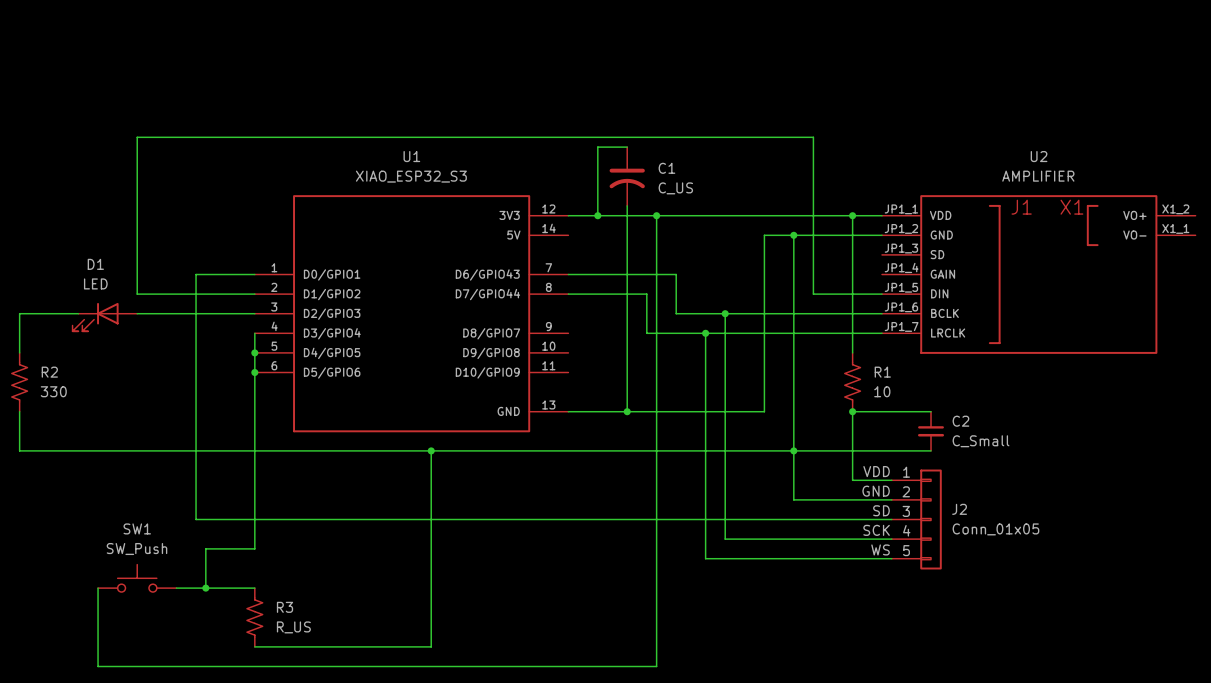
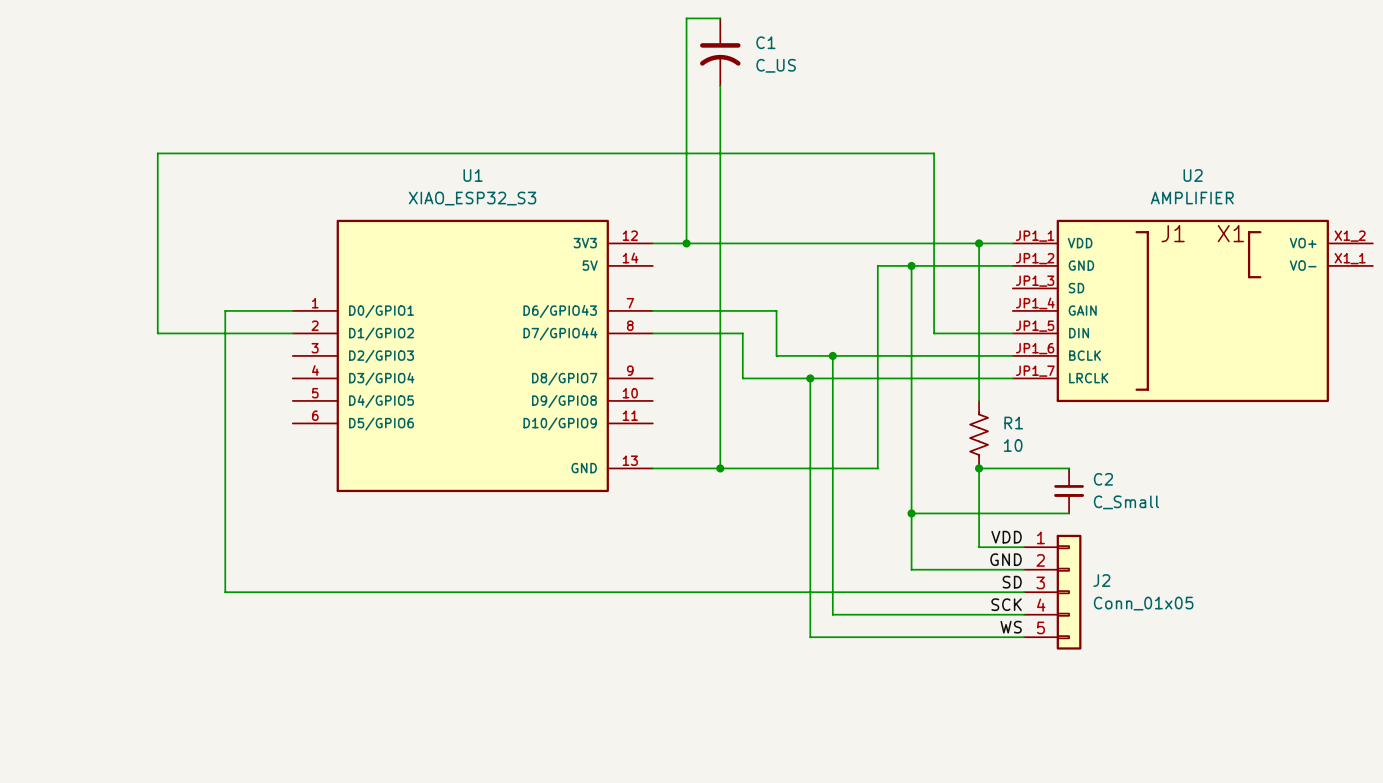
wire: none -> (720, 85) (720, 232)
wire: (597, 147) (627, 147) -> (686, 164) (686, 18) (720, 18)
C1 position: (627, 176) -> (720, 52)
wire: (656, 215) (656, 666) (98, 666) (98, 588) -> none
junction: (656, 215) -> none
wire: (78, 313) (19, 313) (19, 352) -> none
wire: (137, 313) (254, 313) -> none
D1: LED (104, 317) -> none
wire: (254, 333) (254, 548) (205, 548) (205, 588) -> none
junction: (254, 352) -> none
junction: (254, 372) -> none
R2: 330 (19, 382) -> none
wire: (19, 411) (19, 450) (793, 450) -> none
wire: (431, 450) (431, 646) (254, 646) -> none
junction: (431, 450) -> none
SW1: SW_Push (137, 578) -> none
wire: (176, 588) (254, 588) -> none
junction: (205, 588) -> none
R3: R_US (254, 617) -> none

